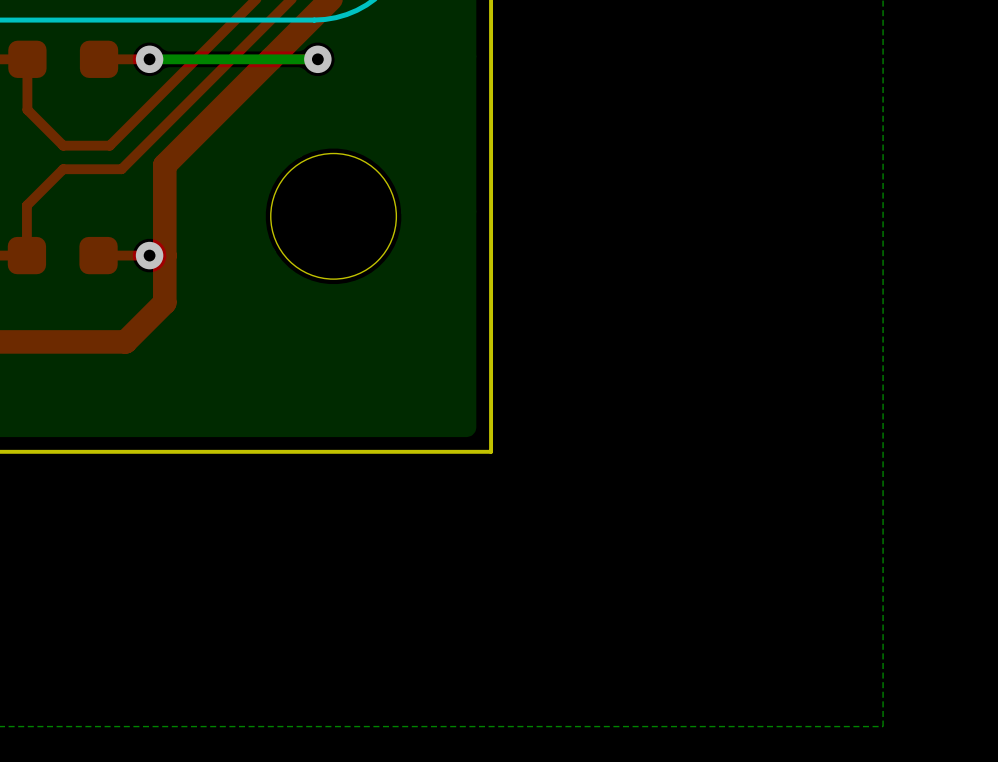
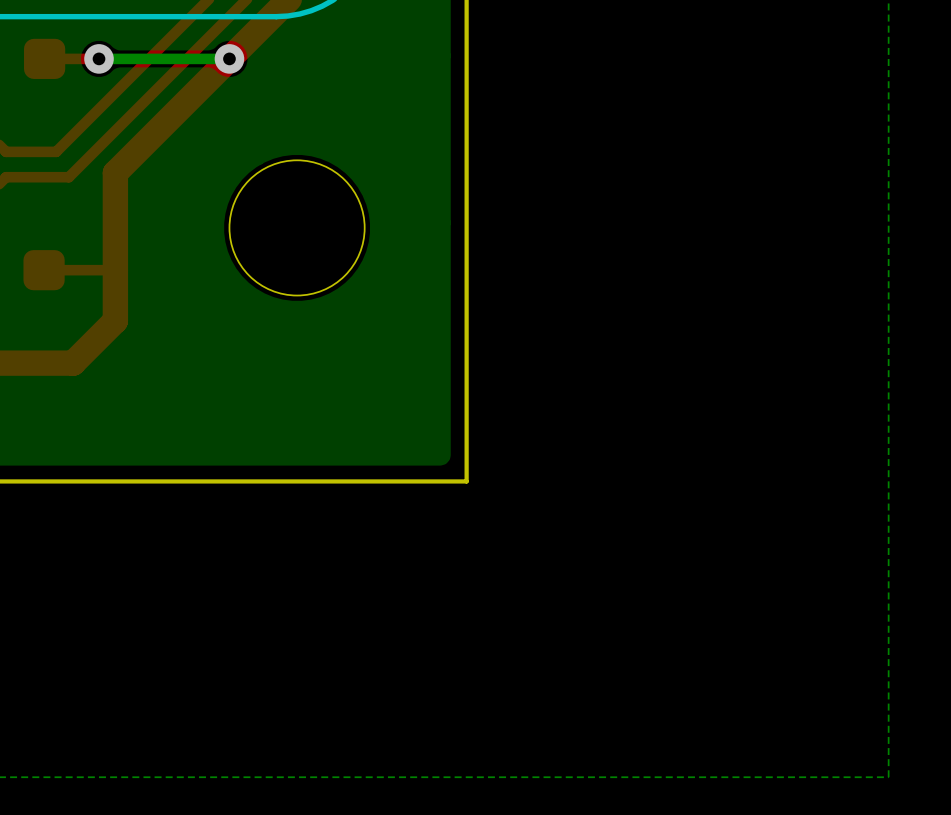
bottom track: (317, 59) (270, 59) -> none
via position: (317, 59) -> (229, 58)
via: (149, 255) -> none

